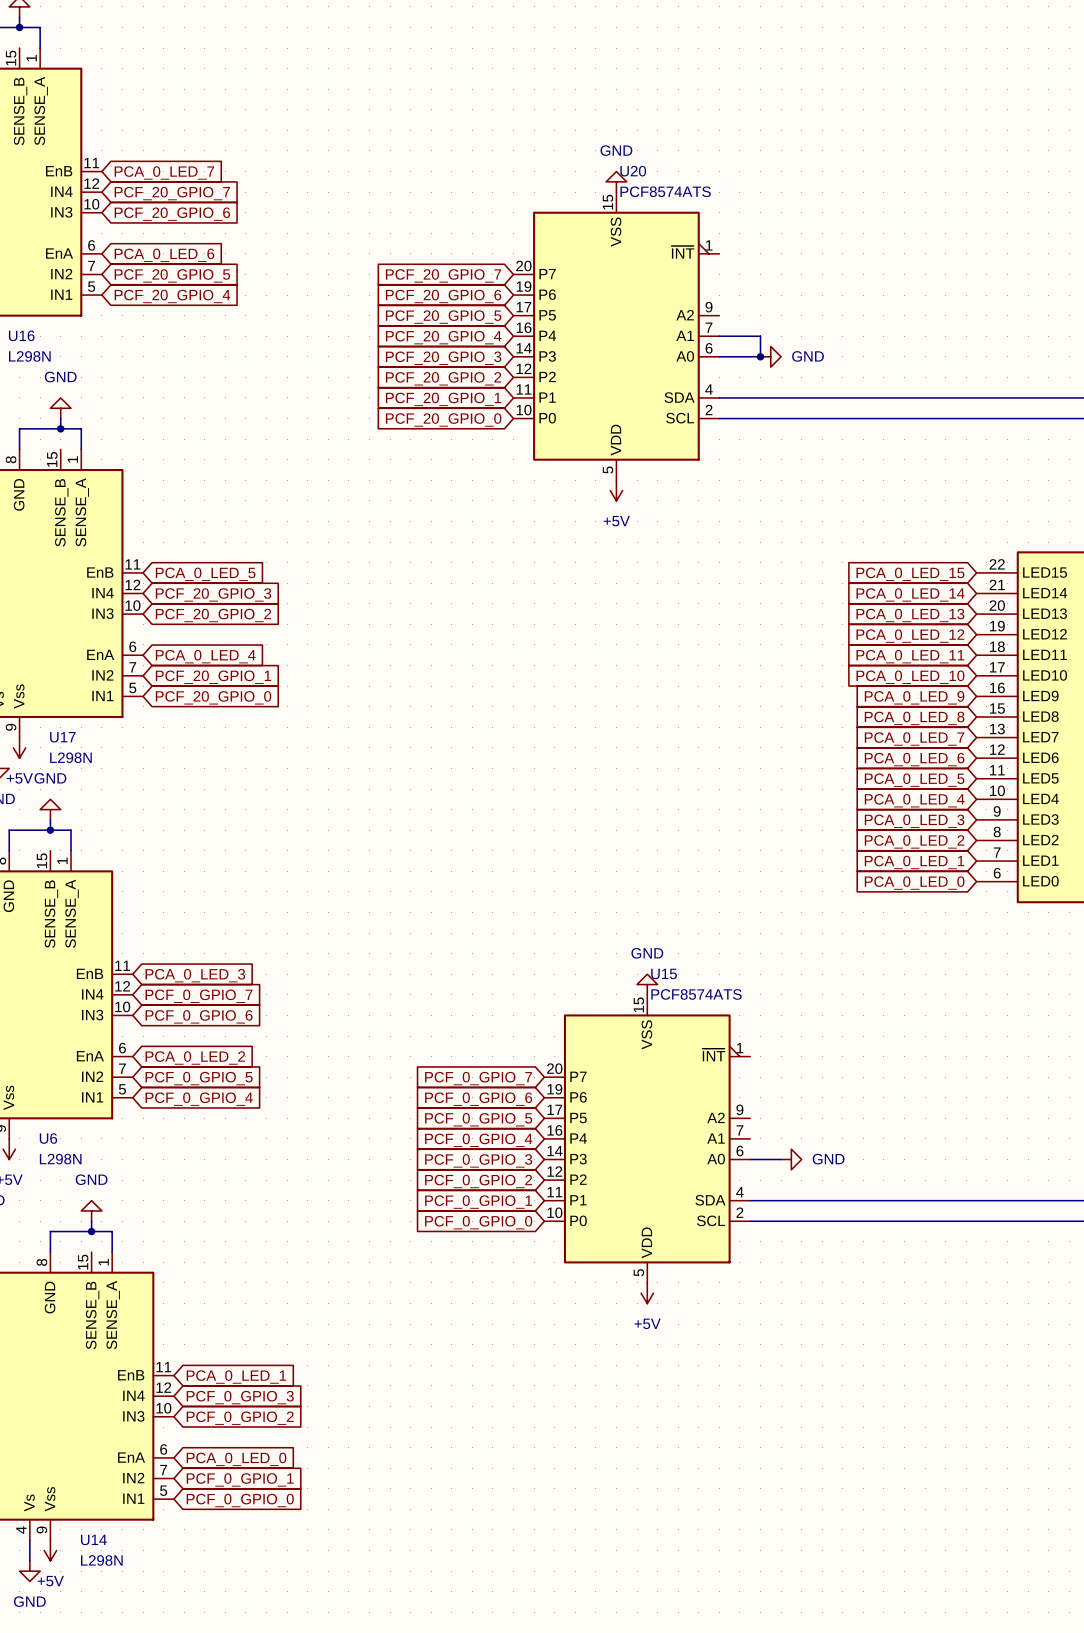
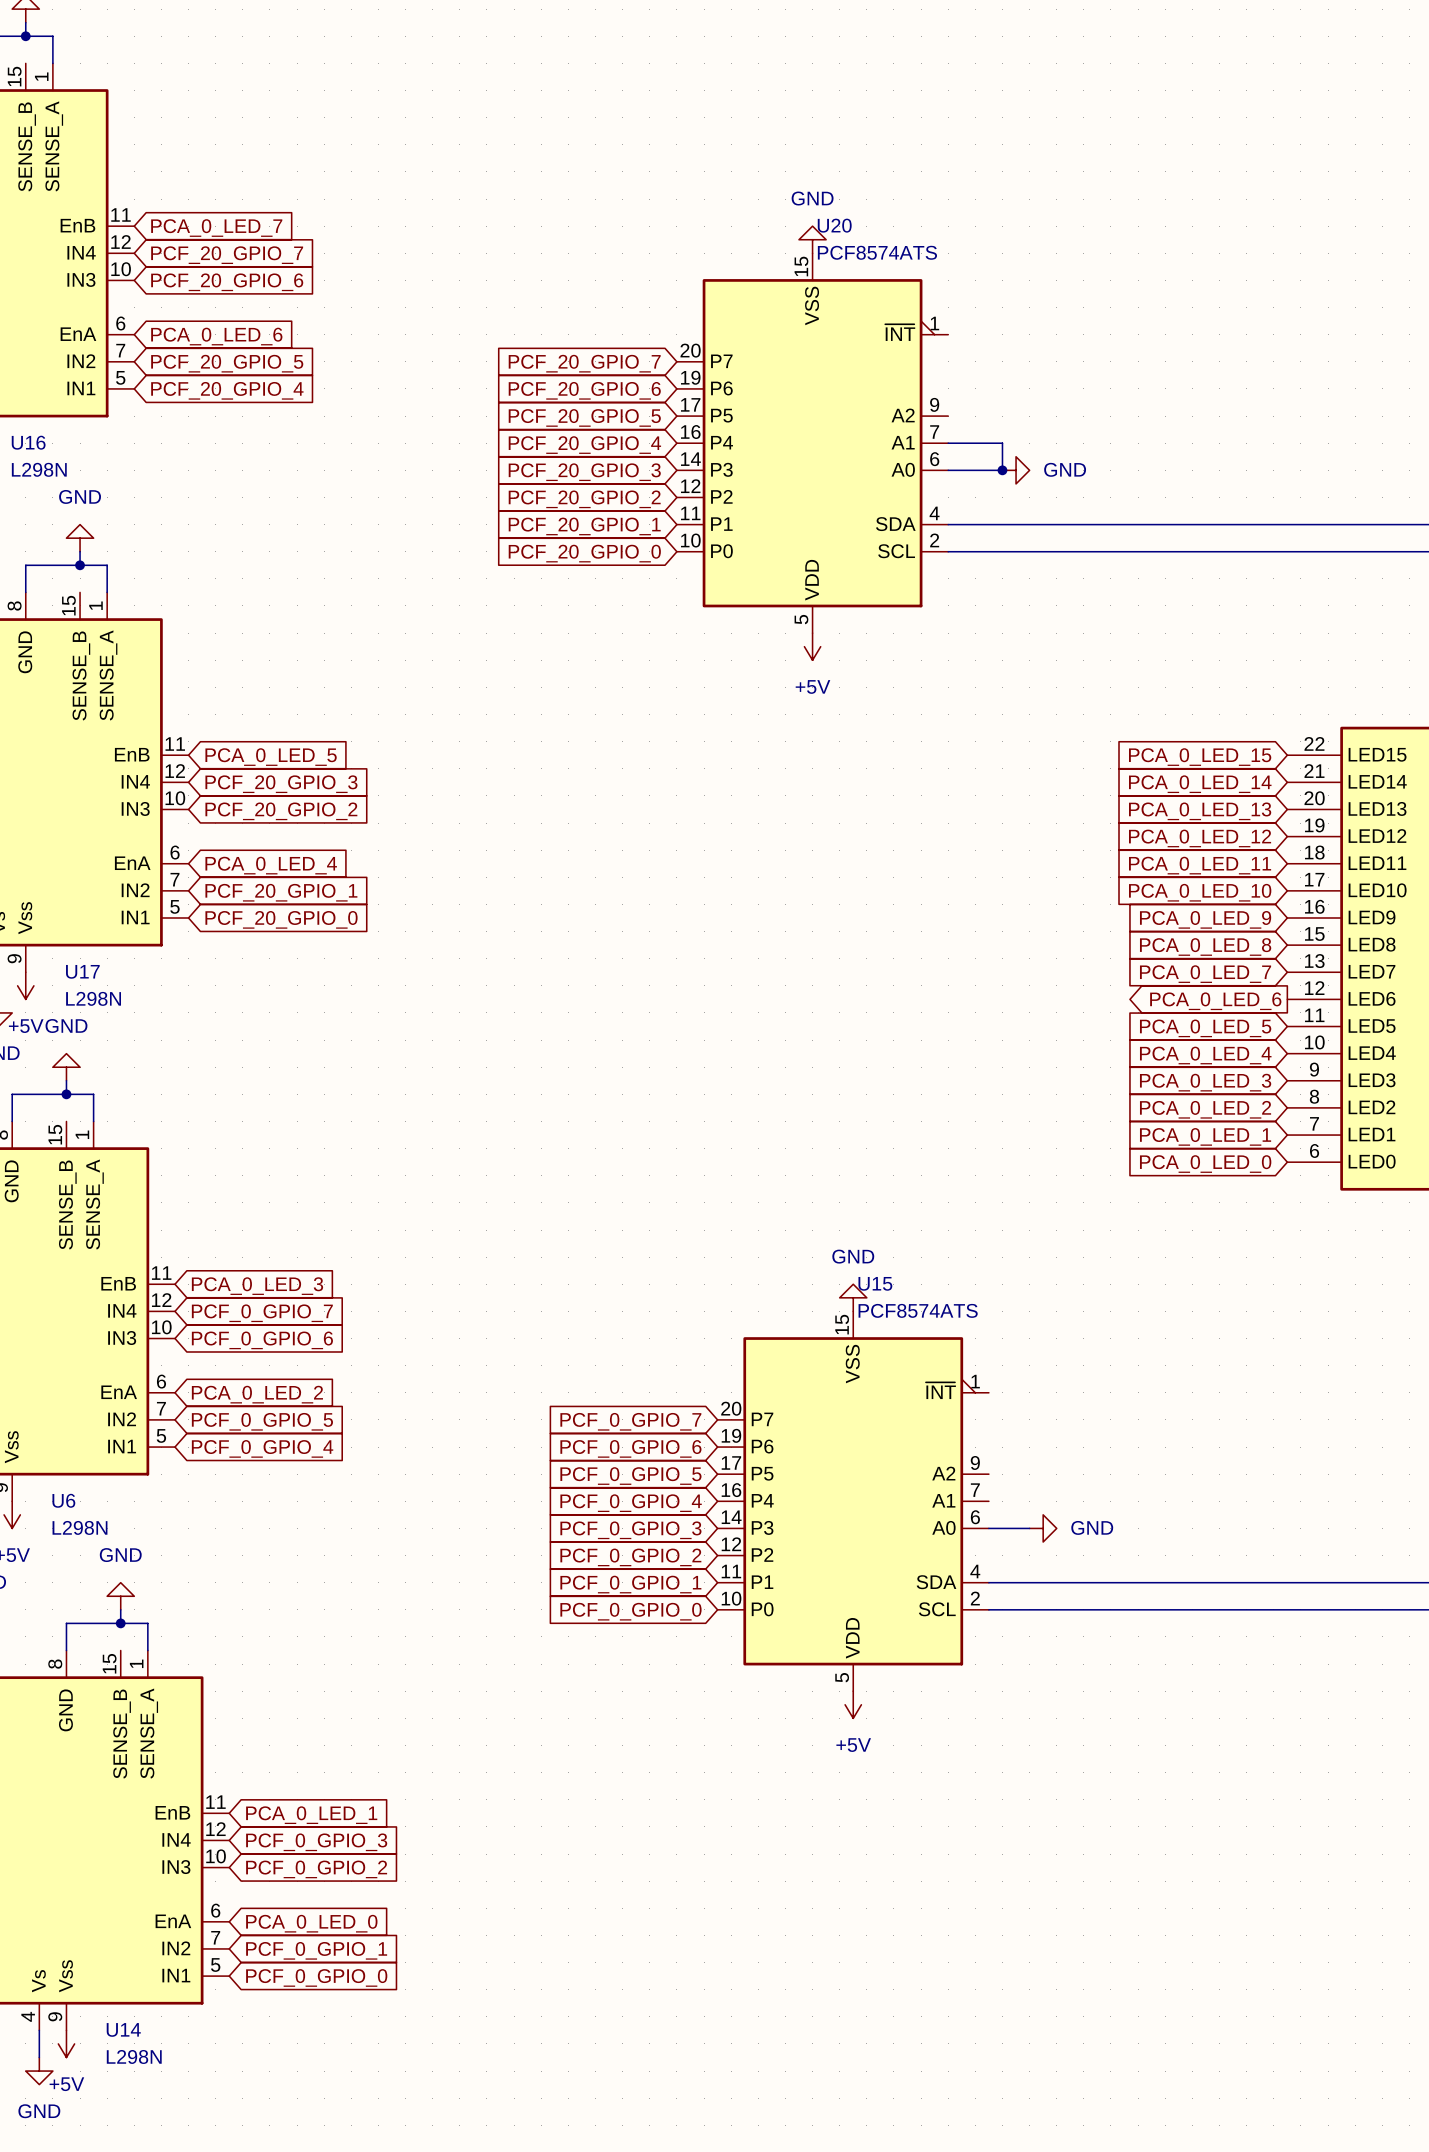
global label shape: input (914, 759) -> output (1215, 1001)

